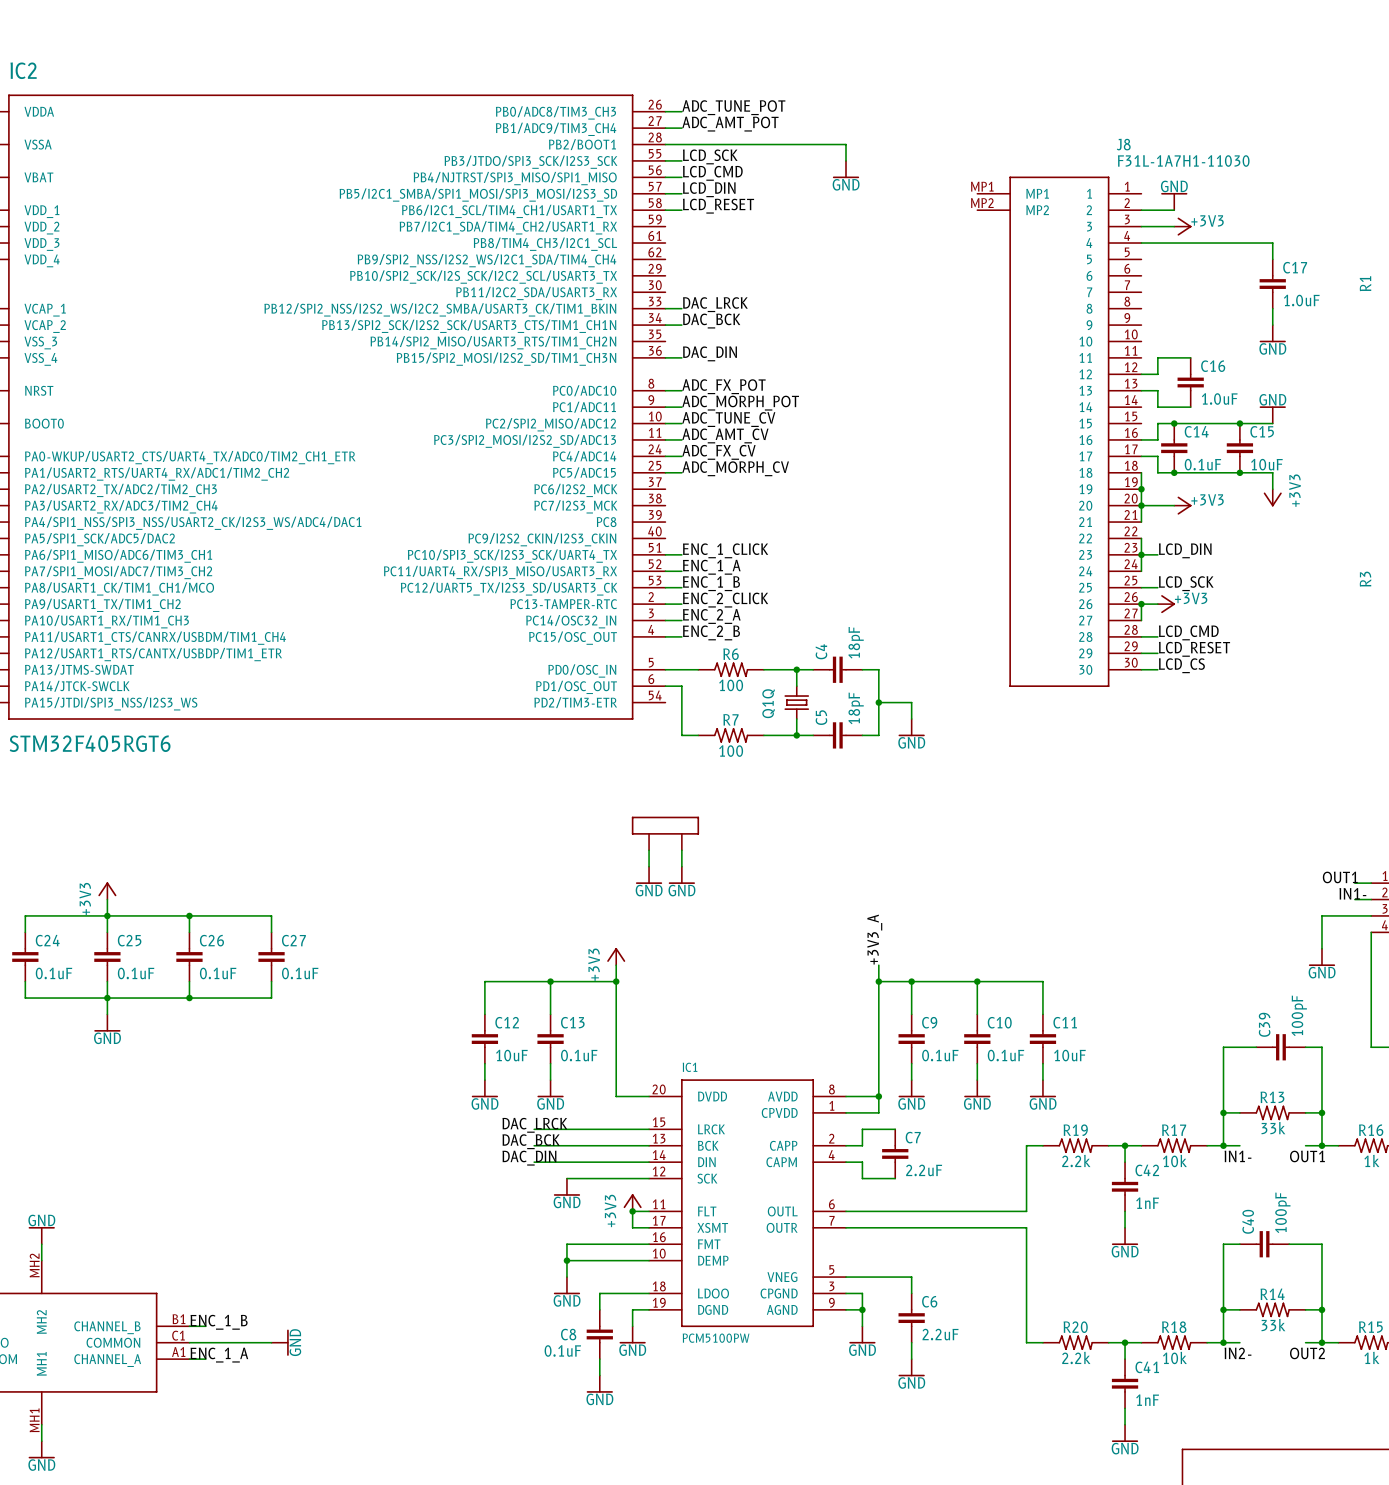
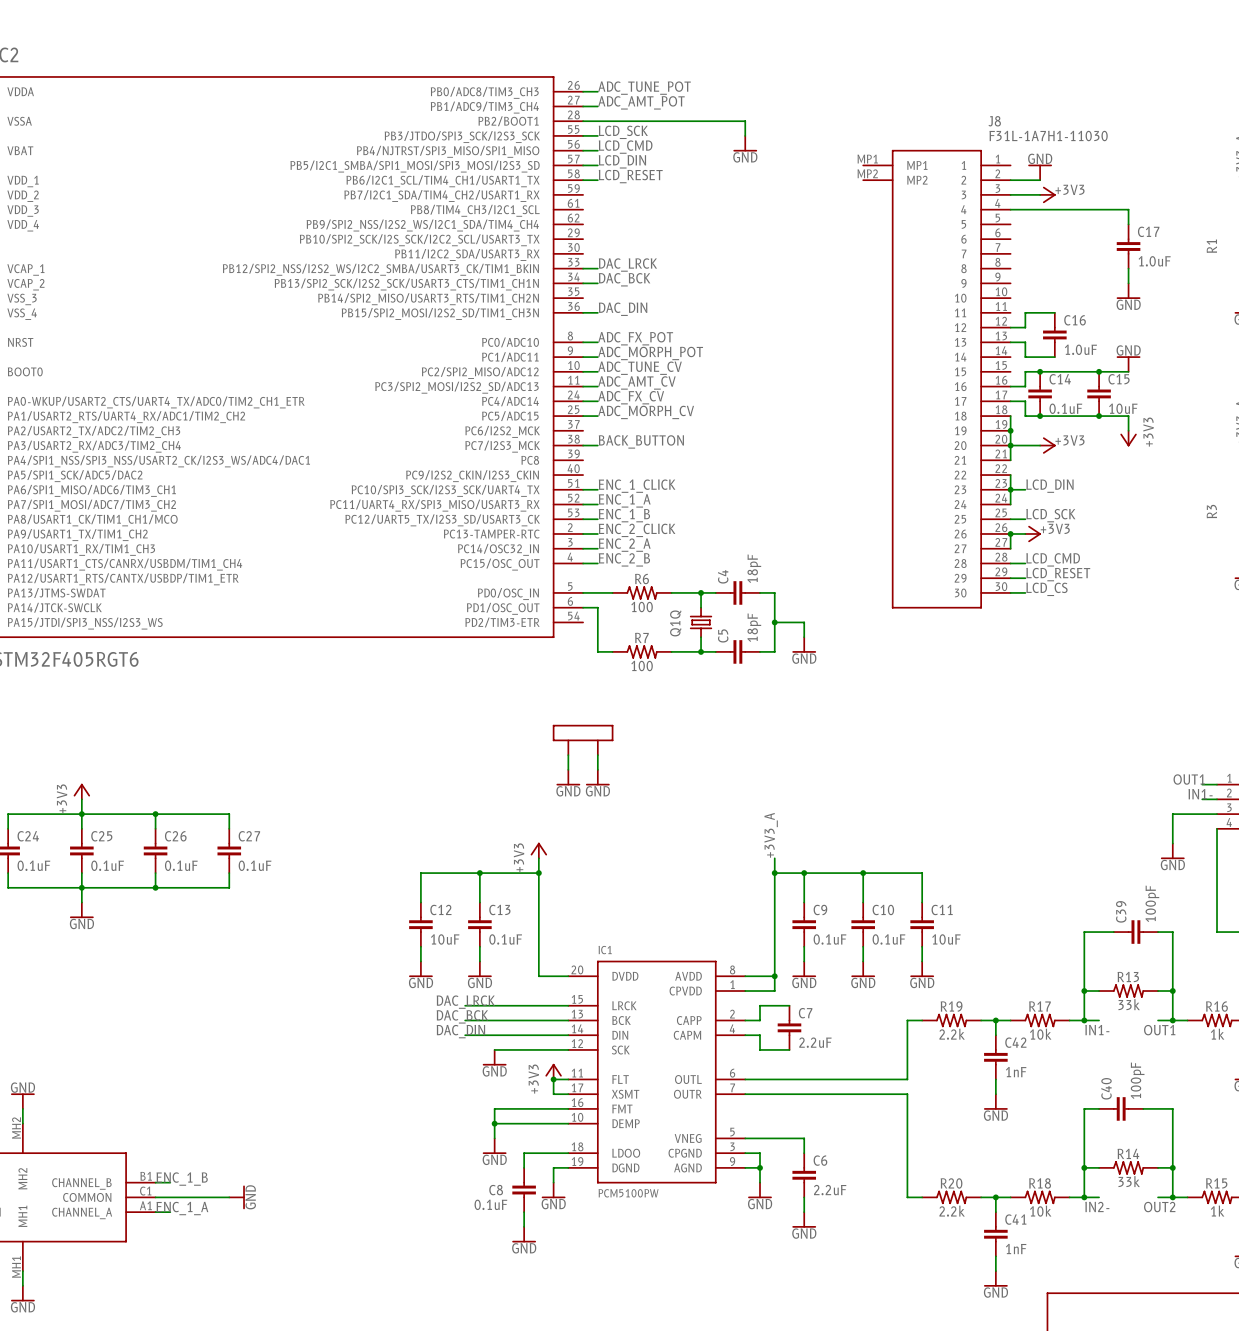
label: none -> BACK_BUTTON (641, 441)
wire: none -> (583, 445) (597, 445)

